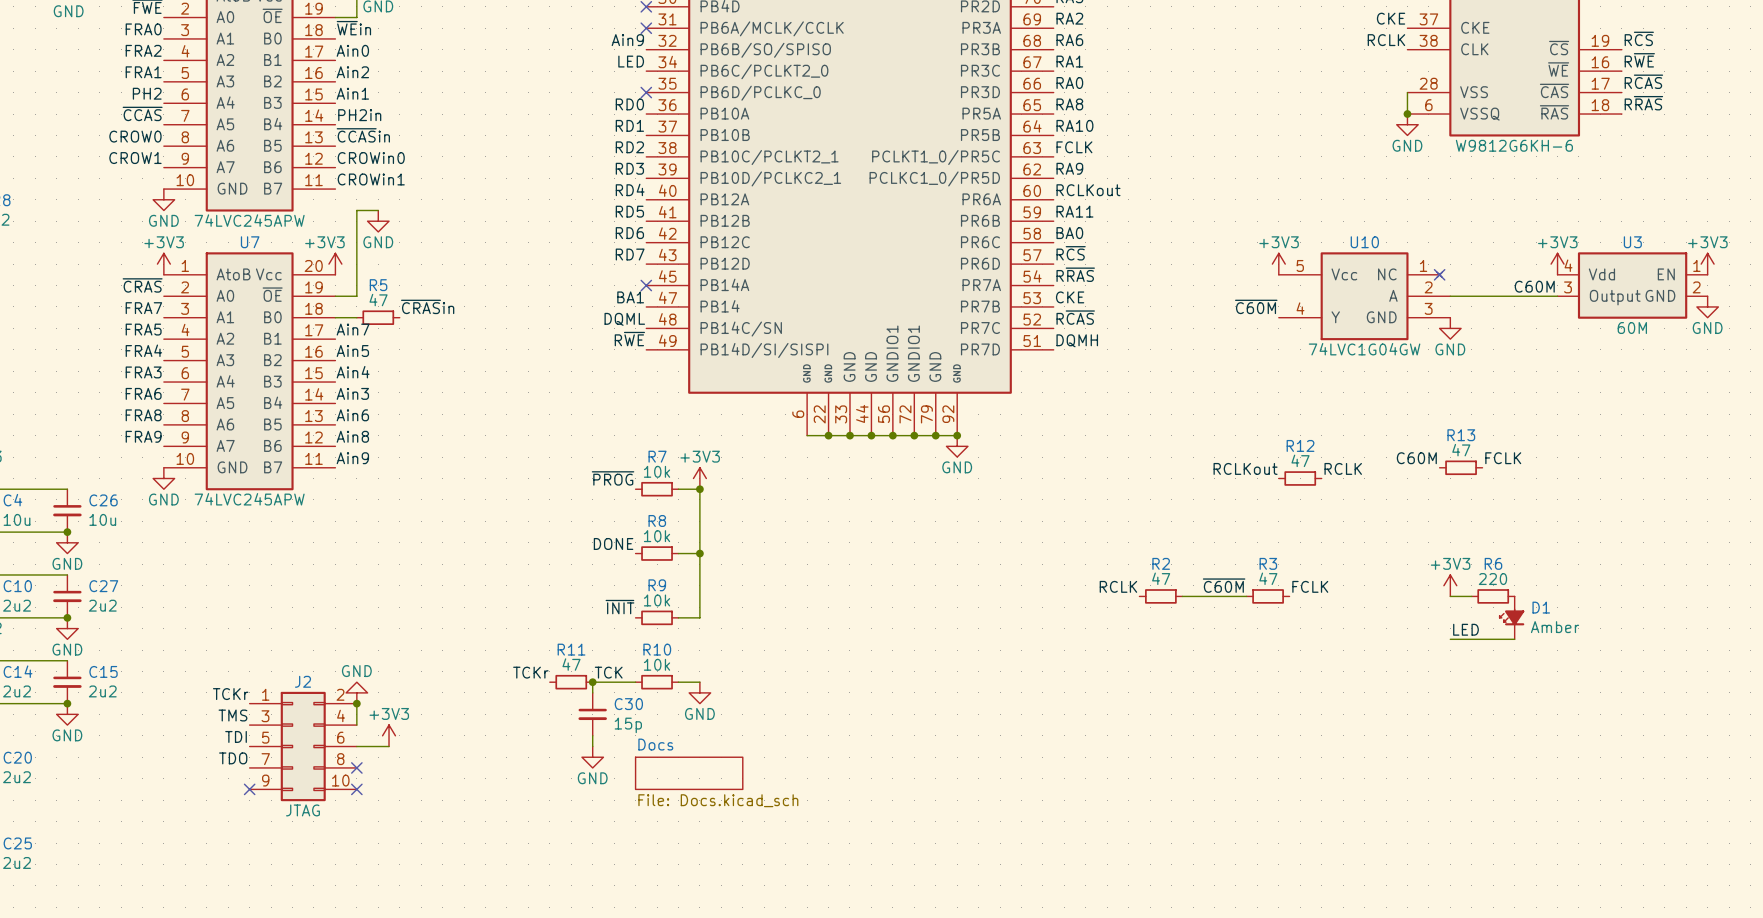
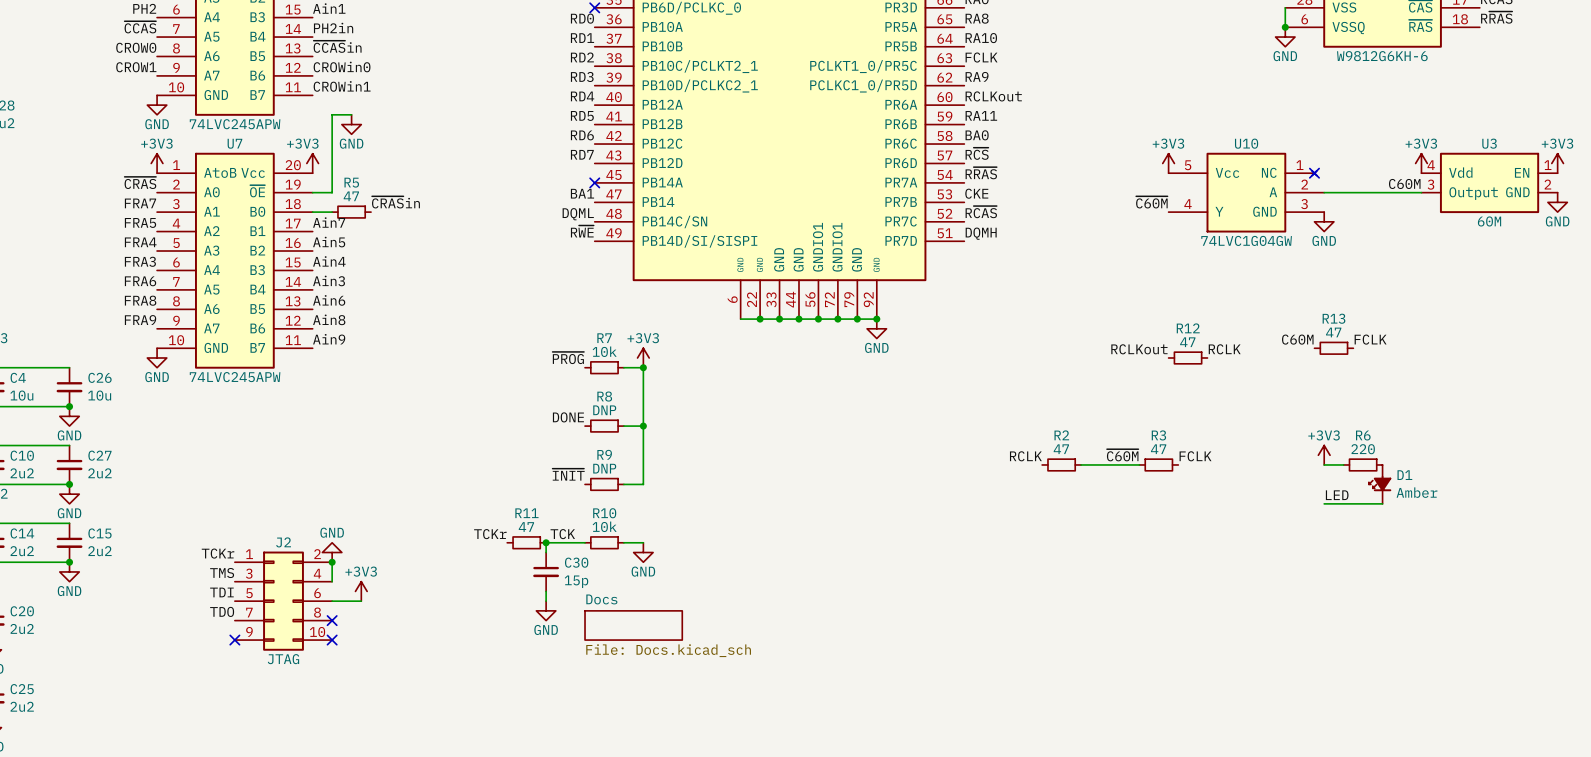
R8 value: 10k (657, 536) -> DNP (604, 410)
R9 value: 10k (657, 600) -> DNP (604, 468)

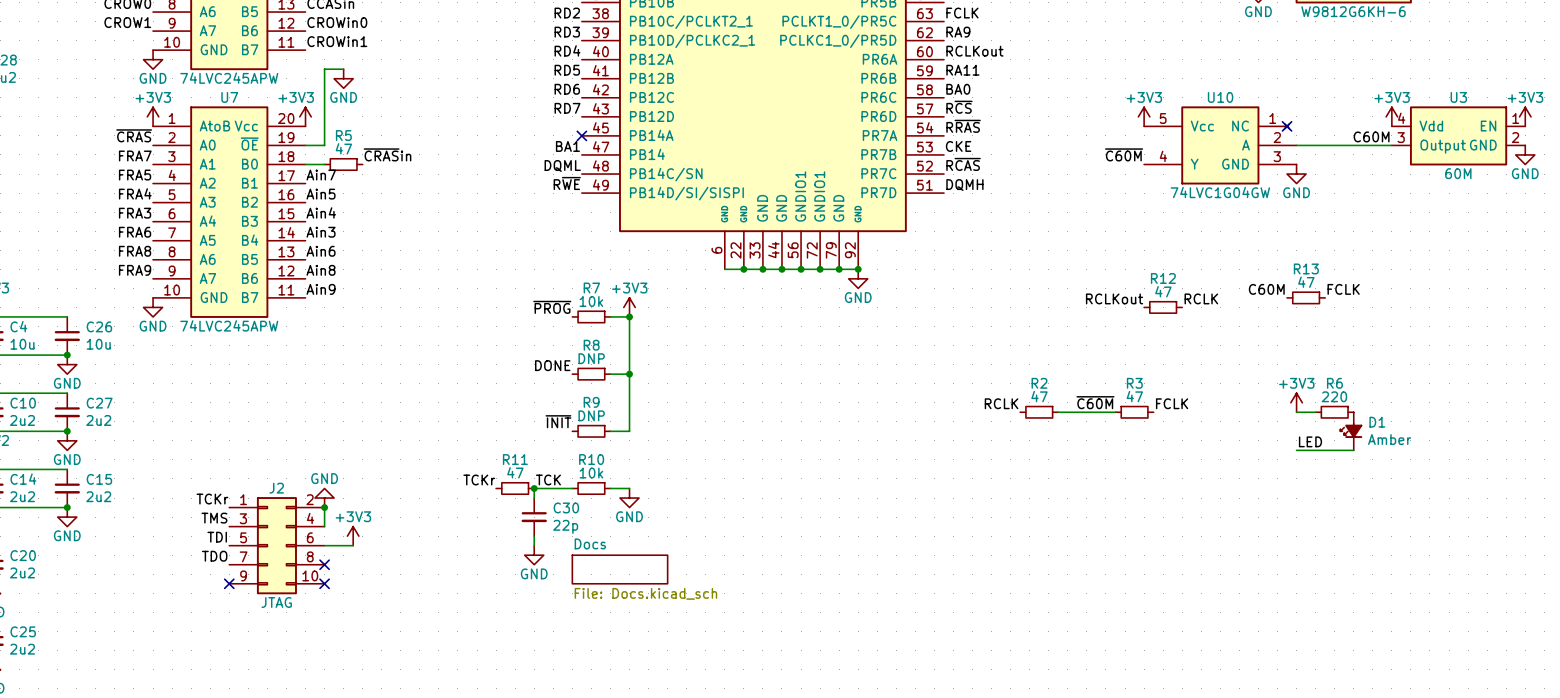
C30 value: 15p (576, 581) -> 22p (565, 526)

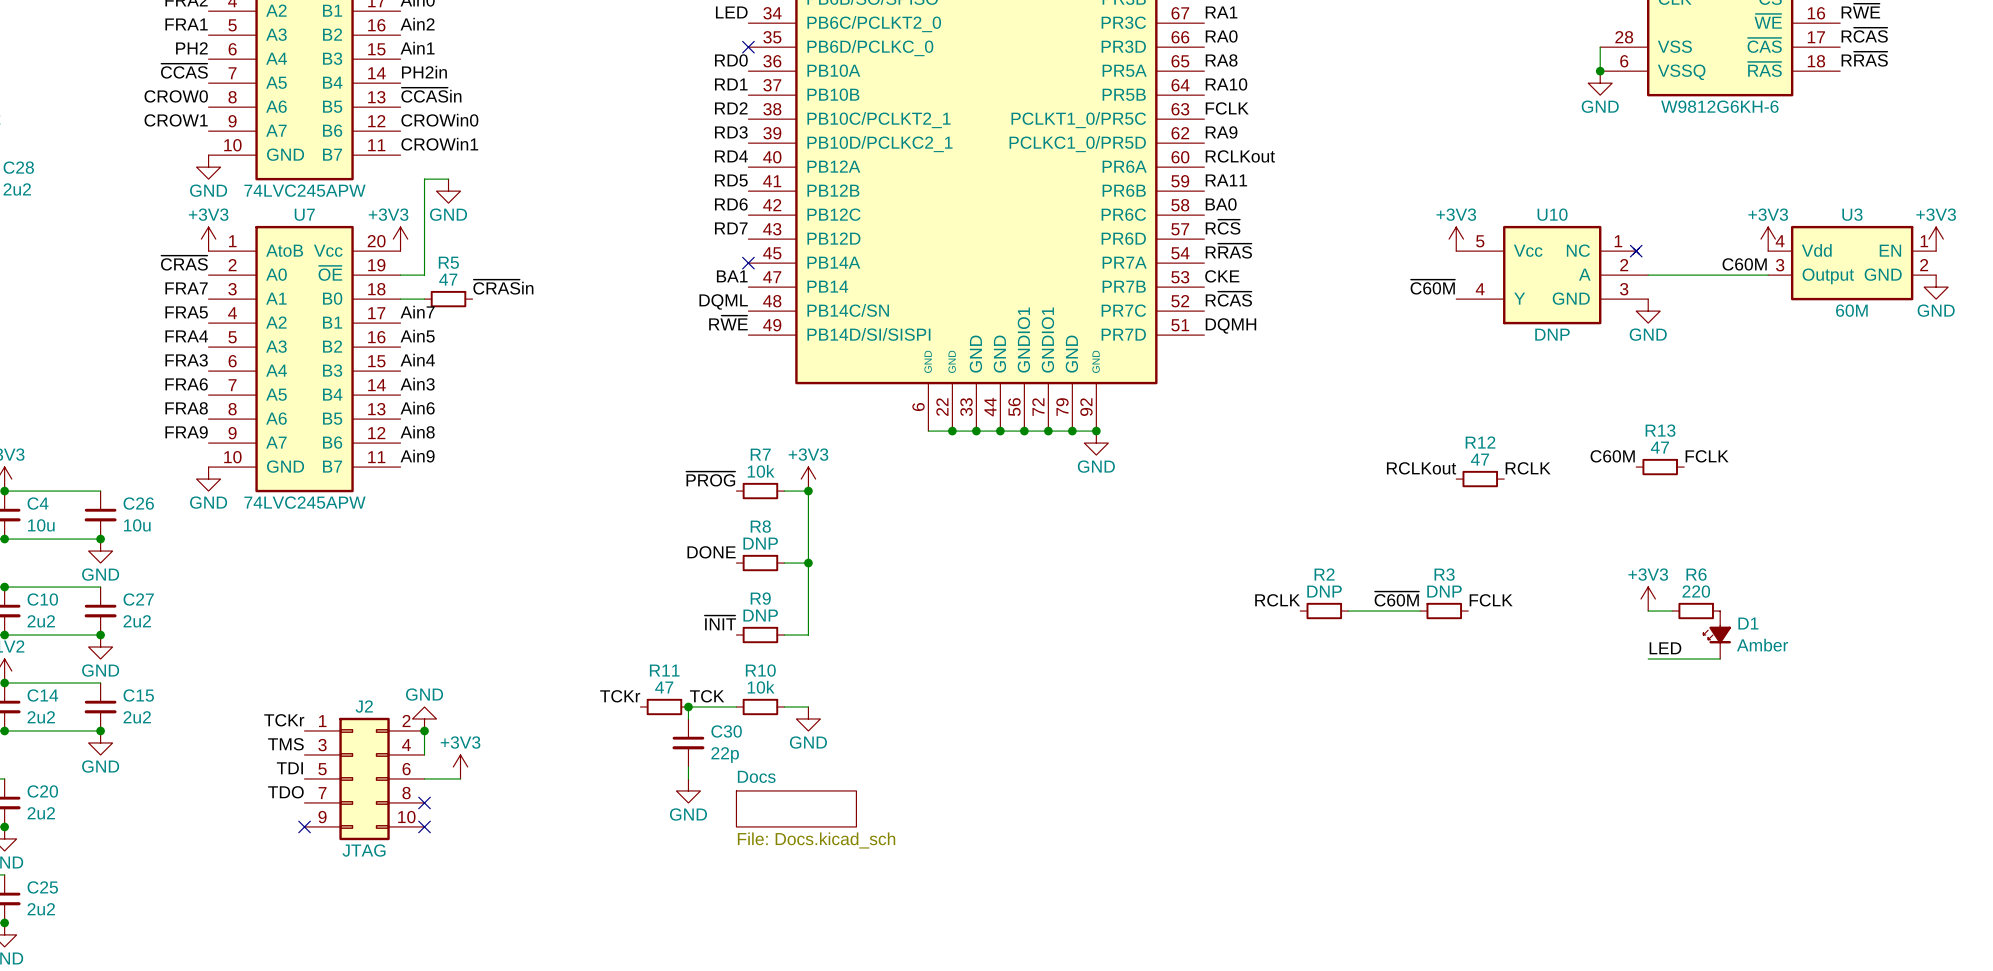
U10 value: 74LVC1G04GW (1220, 192) -> DNP (1552, 334)
R2 value: 47 (1039, 396) -> DNP (1324, 591)
R3 value: 47 (1134, 396) -> DNP (1444, 591)

